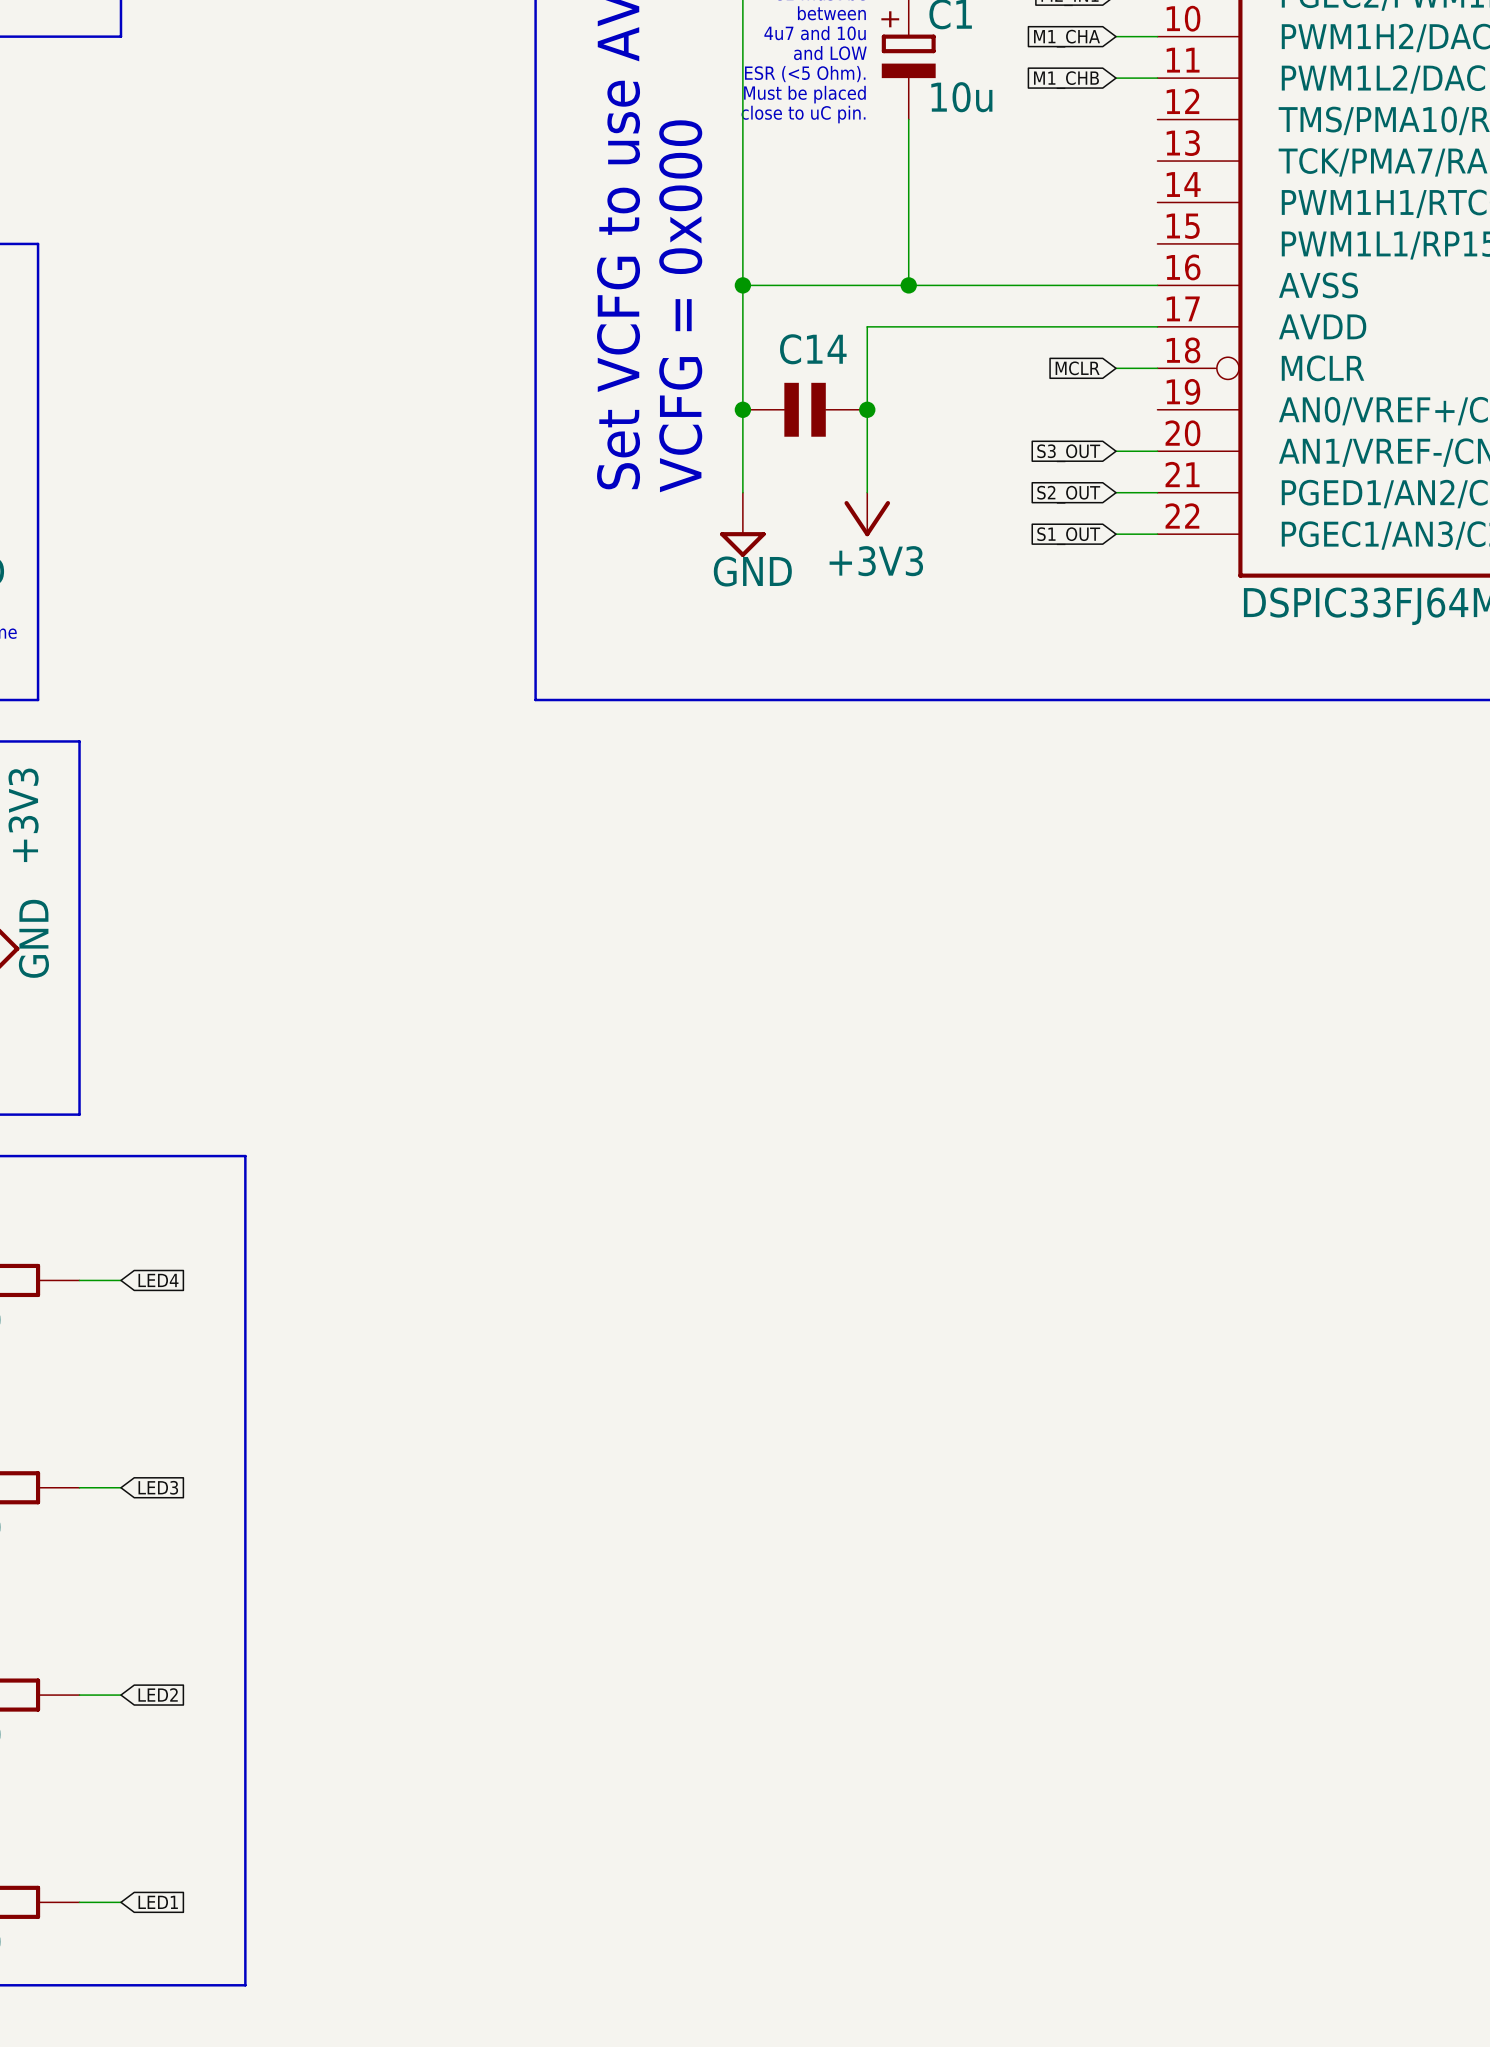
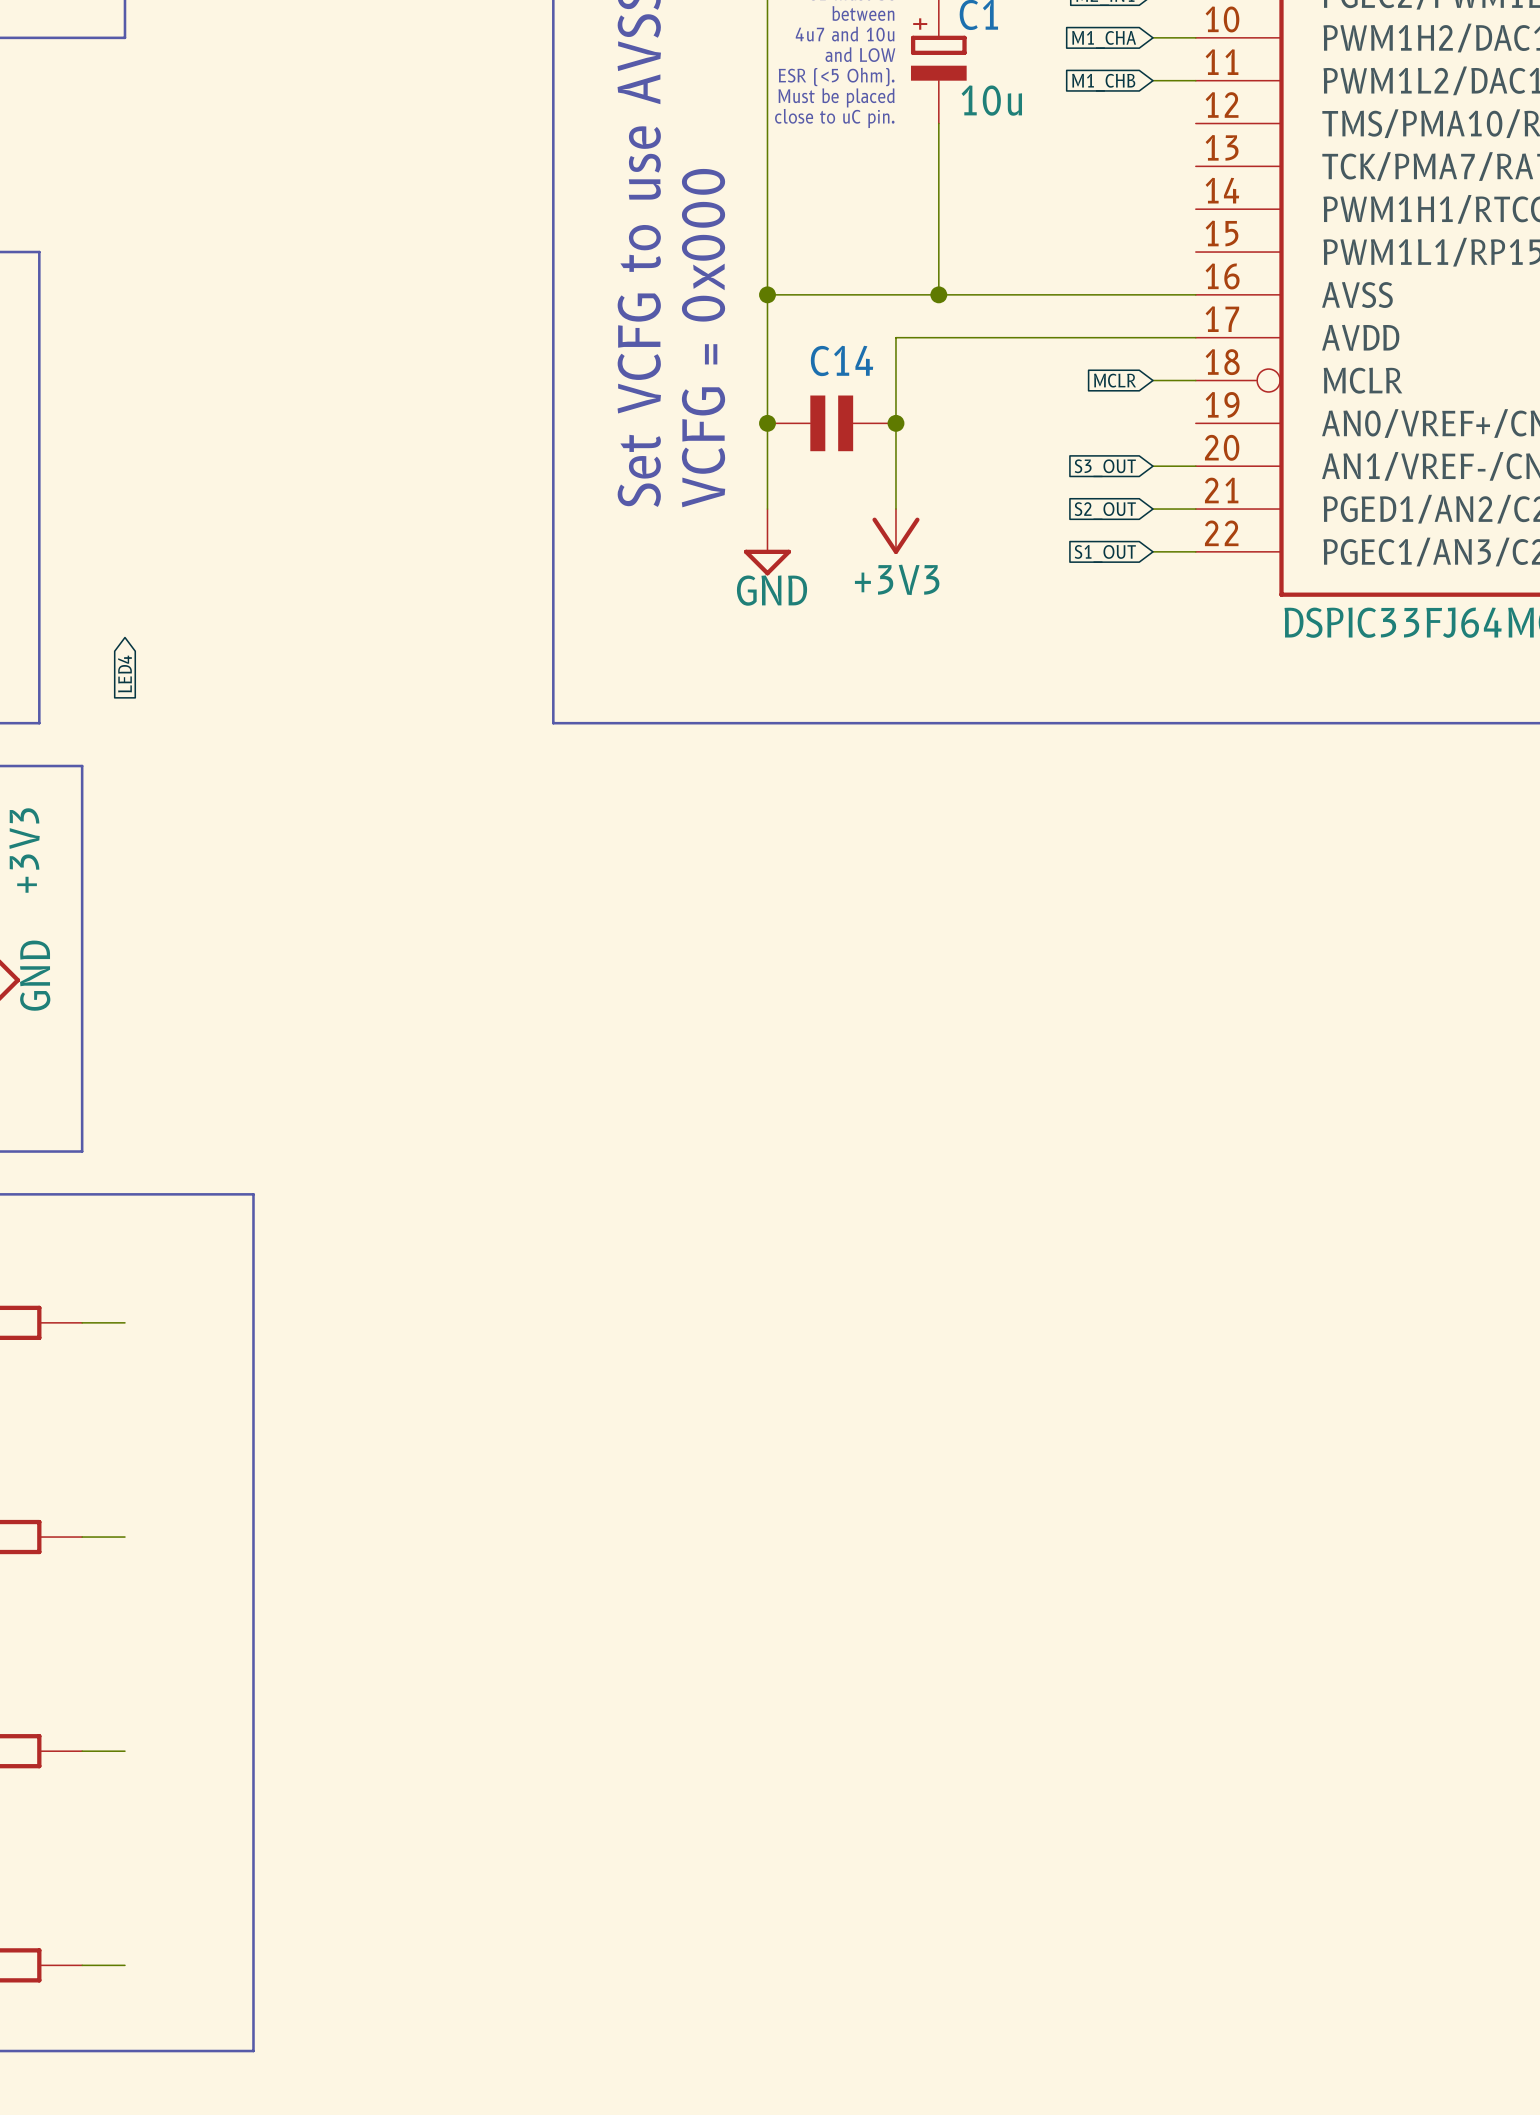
global label: none -> LED4 (124, 674)
global label: LED4 (158, 1280) -> none
global label: LED3 (158, 1487) -> none
global label: LED2 (158, 1694) -> none
global label: LED1 (158, 1902) -> none

